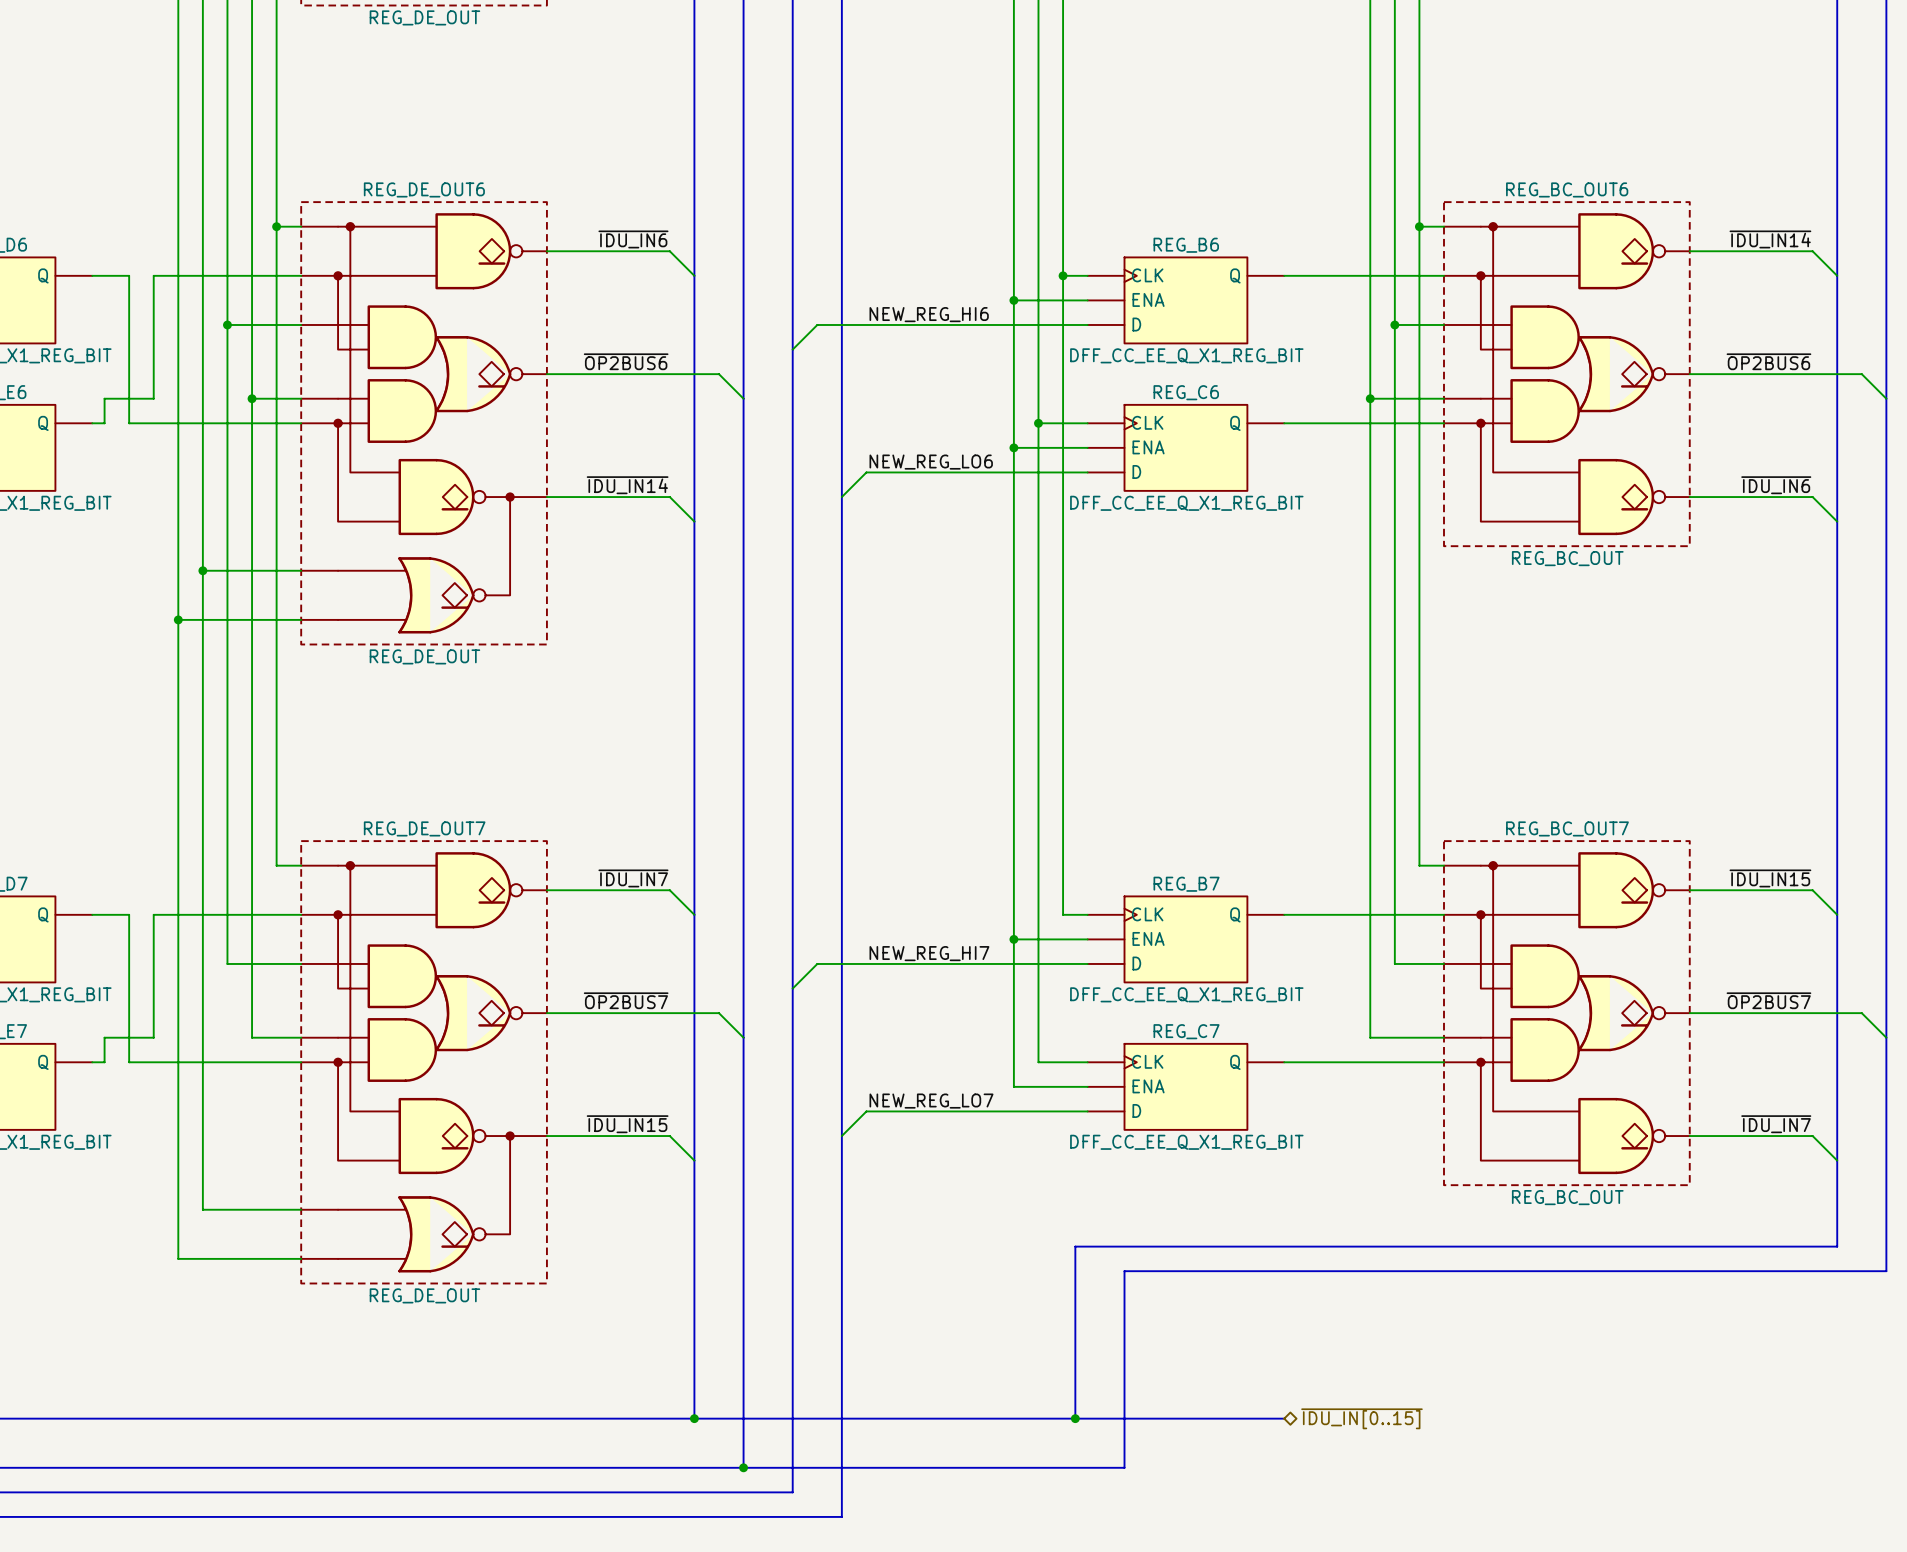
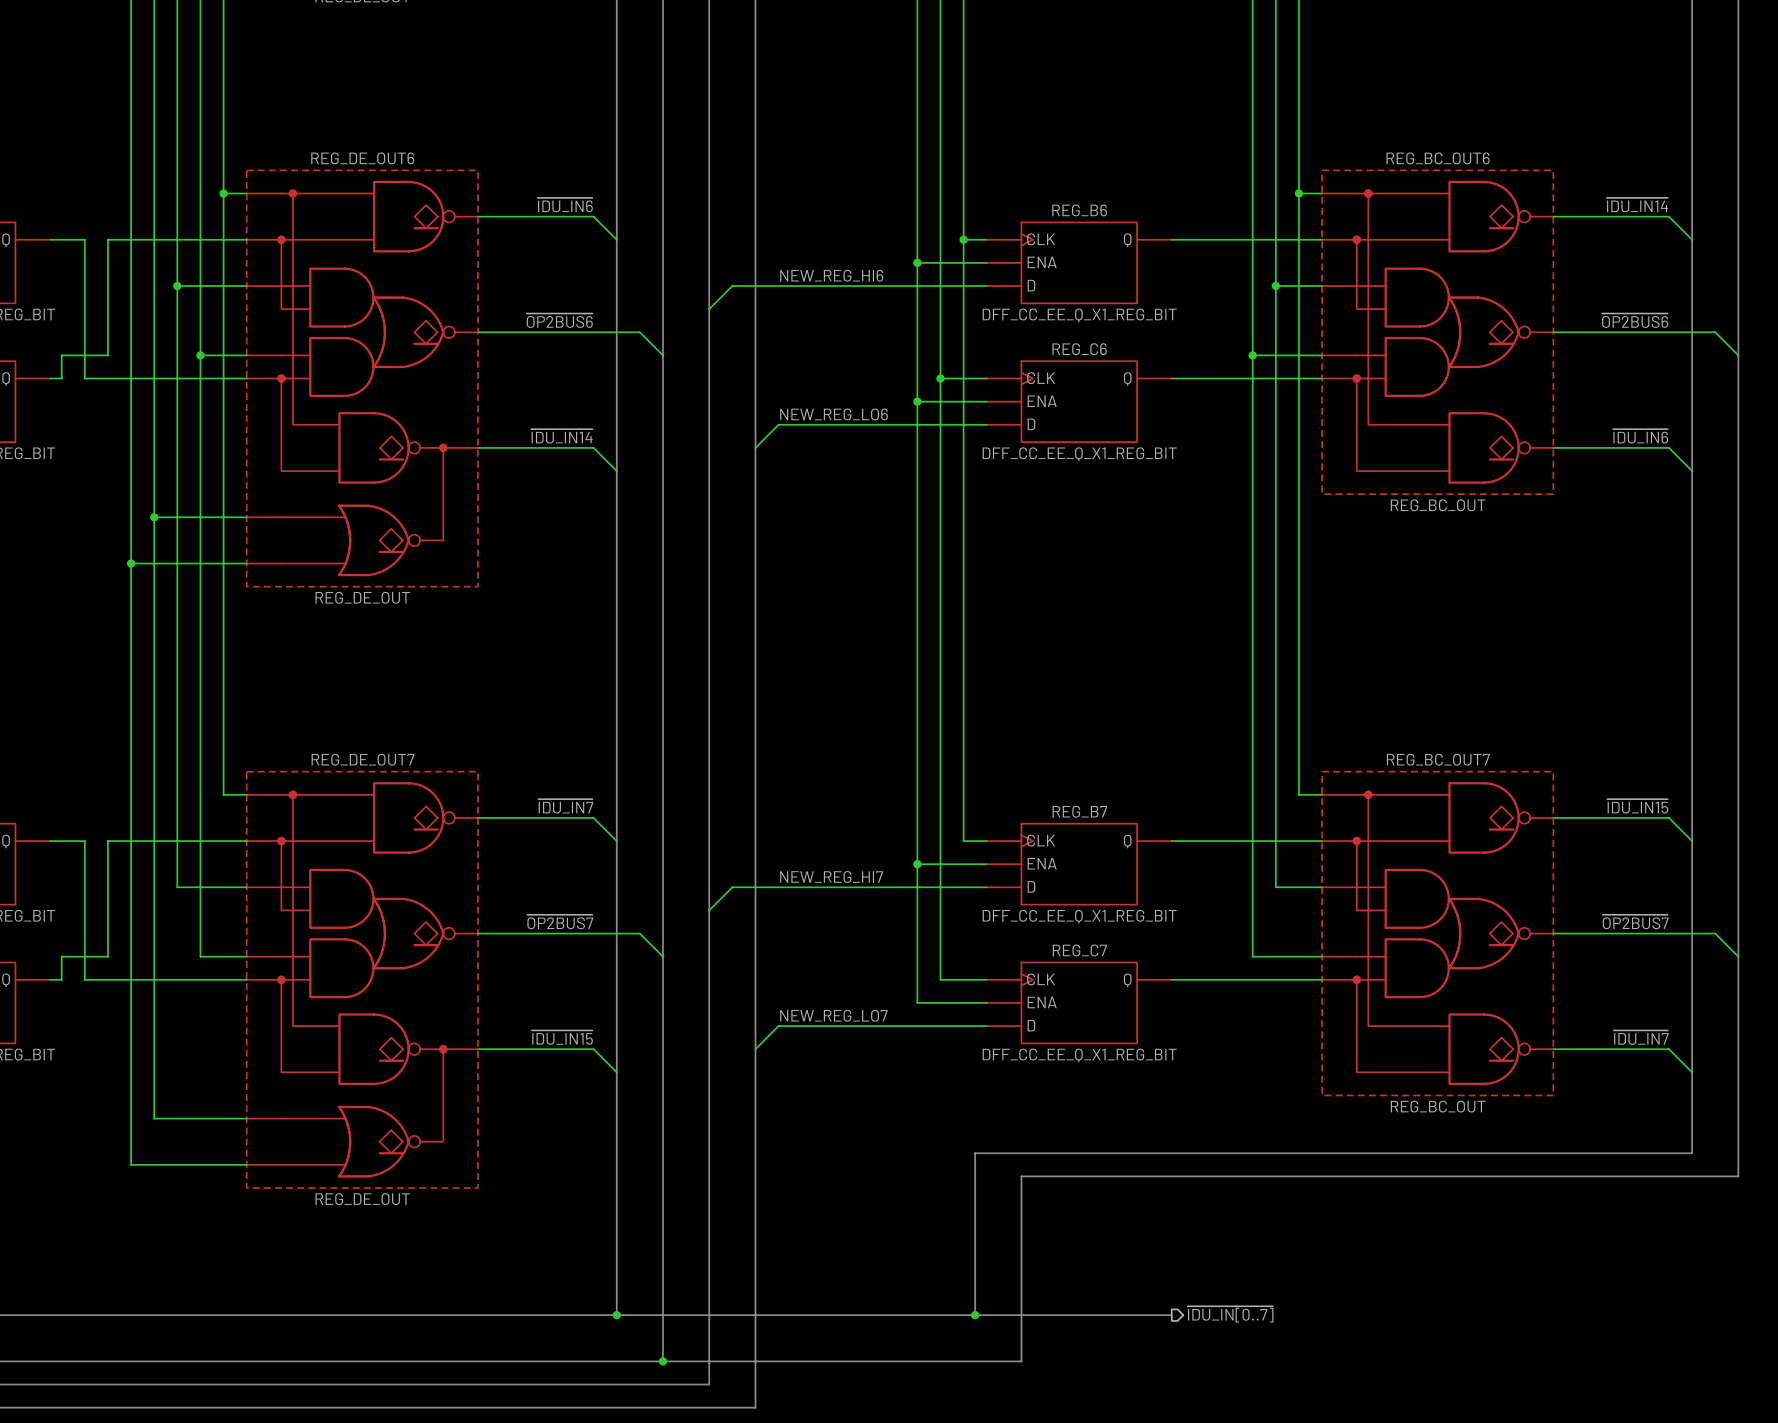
hierarchical label shape: bidirectional (1361, 1418) -> output (1230, 1314)
hierarchical label: ~{IDU_IN[0..15]} (1361, 1418) -> ~{IDU_IN[0..7]} (1230, 1314)

